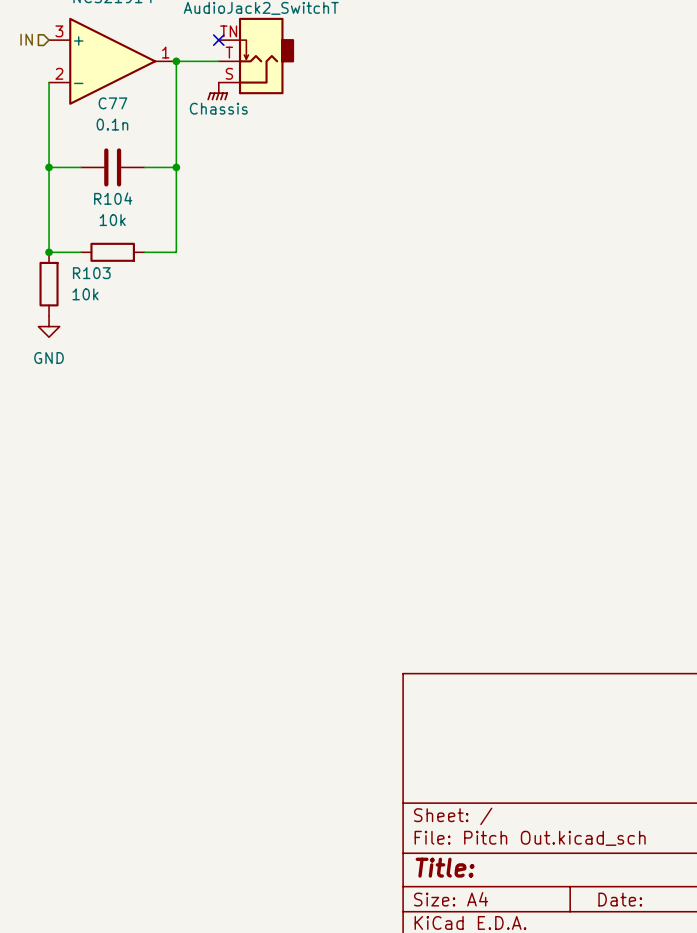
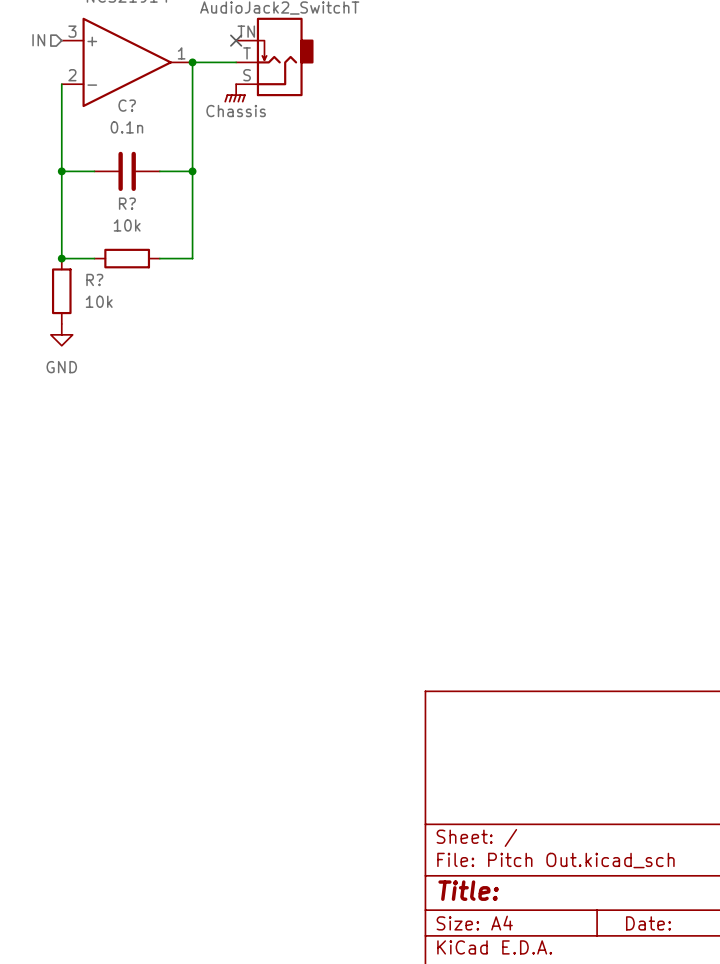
C77 name: C77 (112, 103) -> C? (127, 105)
R104 name: R104 (113, 198) -> R? (127, 203)
R103 name: R103 (91, 273) -> R? (94, 279)

